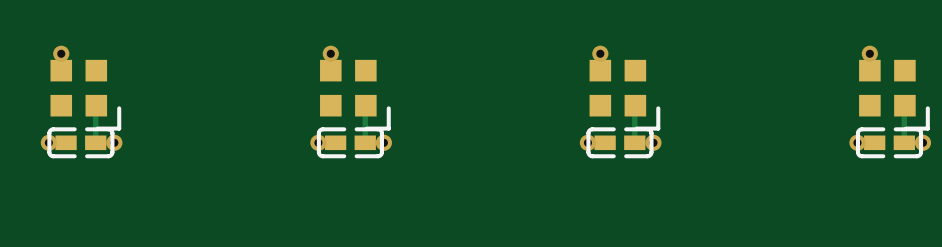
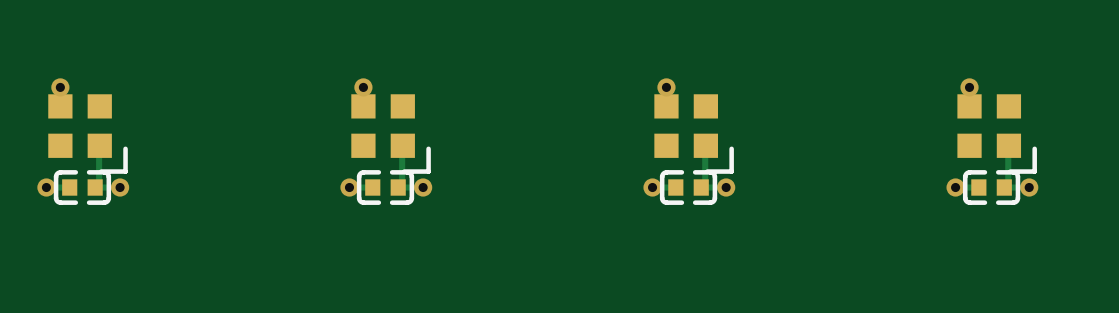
part footprint: [47, 127, 115, 159] -> [53, 170, 112, 205]
part footprint: [316, 127, 384, 159] -> [356, 170, 415, 205]
part footprint: [586, 127, 654, 159] -> [659, 170, 718, 205]
part footprint: [855, 127, 924, 159] -> [962, 170, 1021, 205]

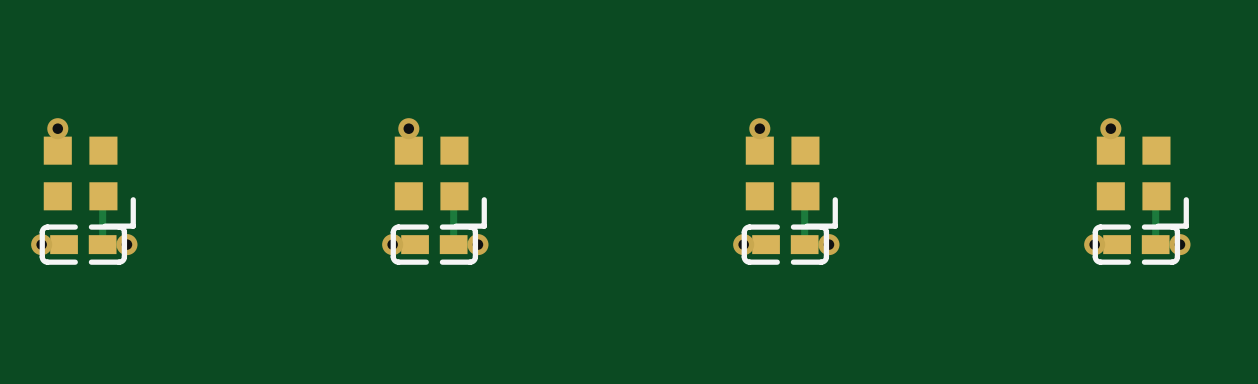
part footprint: [53, 170, 112, 205] -> [39, 224, 128, 265]
part footprint: [356, 170, 415, 205] -> [390, 224, 479, 265]
part footprint: [659, 170, 718, 205] -> [741, 224, 830, 265]
part footprint: [962, 170, 1021, 205] -> [1092, 224, 1181, 265]

